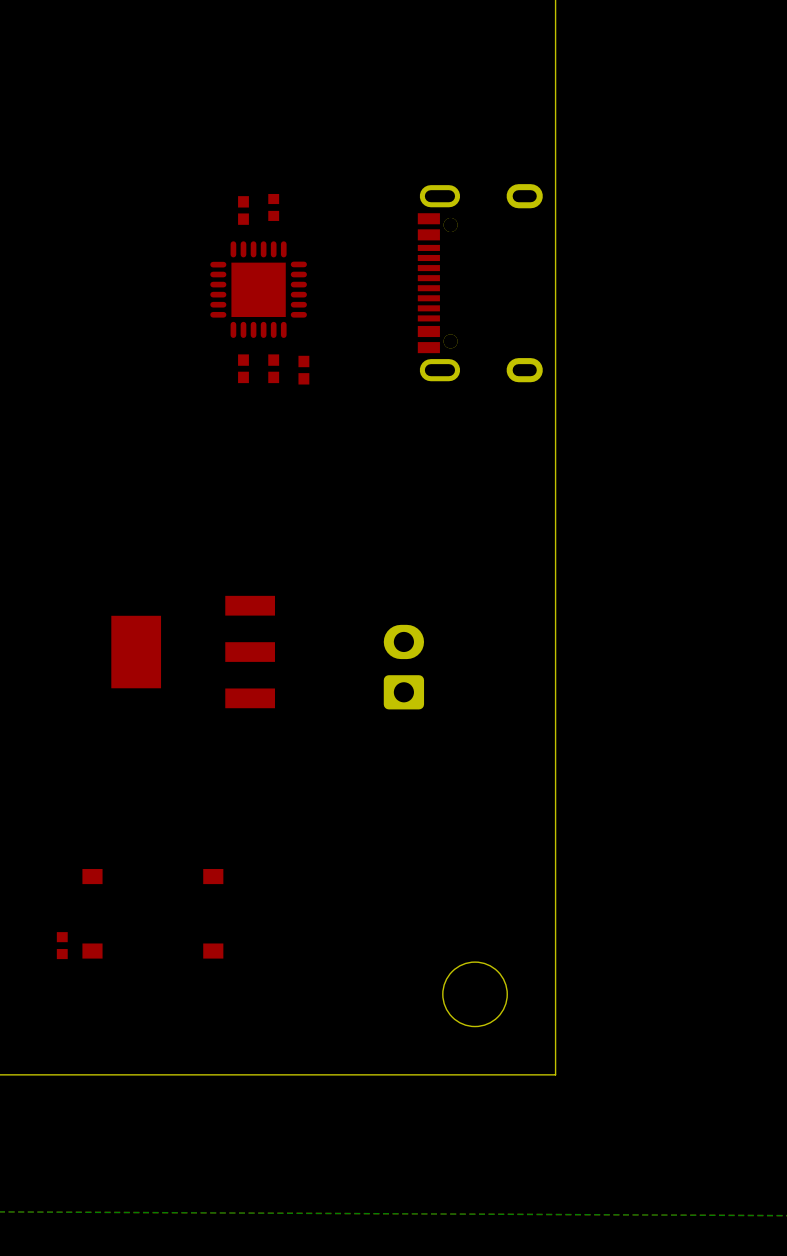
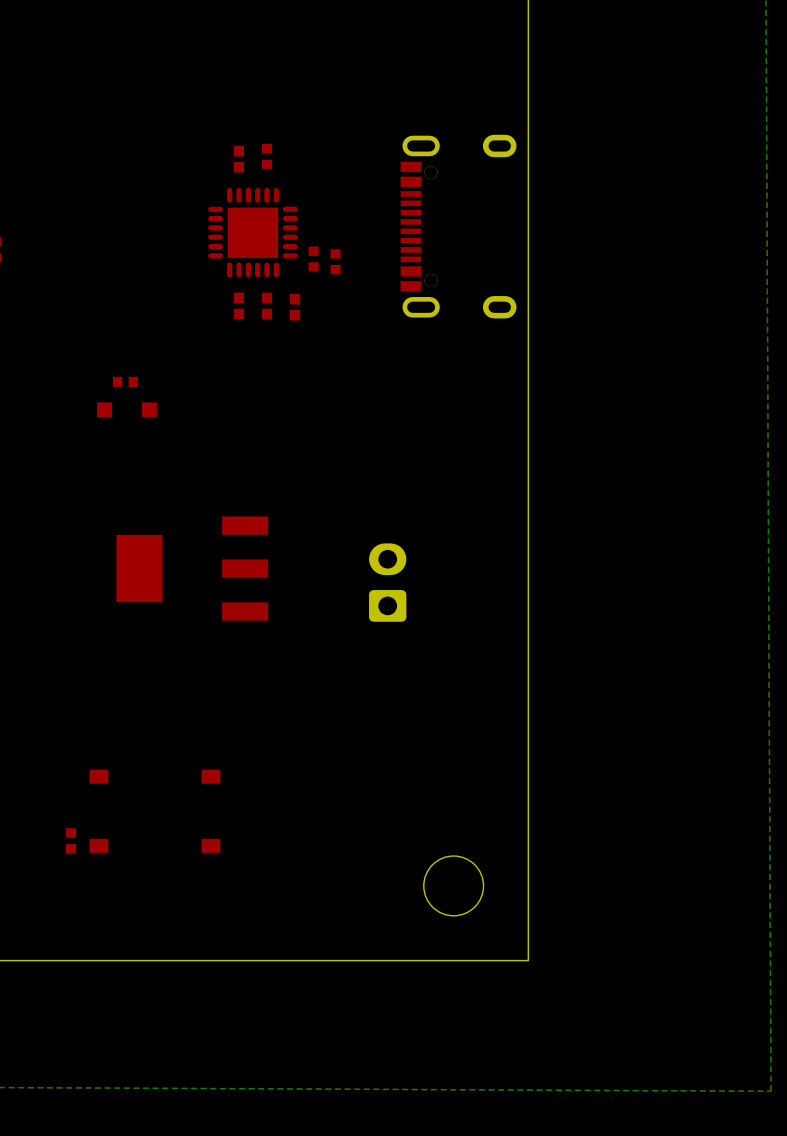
part: none -> (313, 259)
part: none -> (335, 261)
part: none -> (125, 381)
part: none -> (126, 409)

